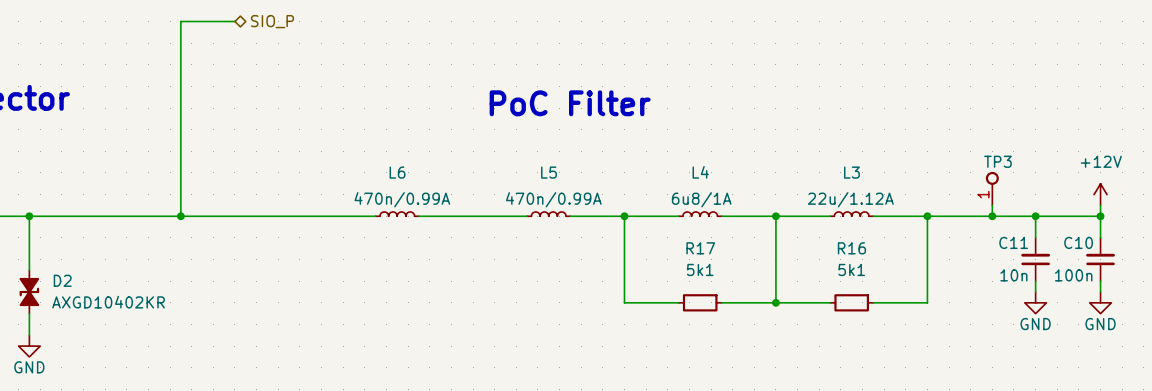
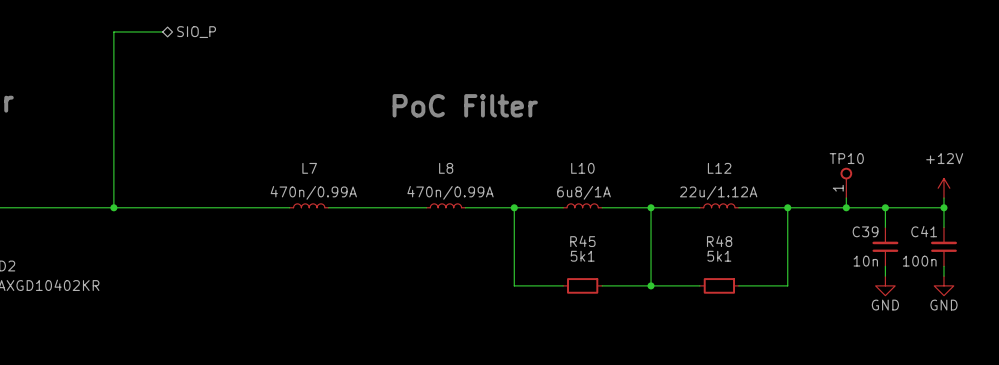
TP3 name: TP3 (997, 161) -> TP10 (846, 158)
L6 name: L6 (397, 172) -> L7 (309, 168)
L5 name: L5 (548, 172) -> L8 (446, 168)
L4 name: L4 (700, 172) -> L10 (582, 168)
L3 name: L3 (851, 172) -> L12 (719, 168)
C11 name: C11 (1013, 242) -> C39 (865, 231)
C10 name: C10 (1078, 242) -> C41 (924, 231)
R17 name: R17 (700, 248) -> R45 (582, 241)
R16 name: R16 (851, 248) -> R48 (719, 241)

